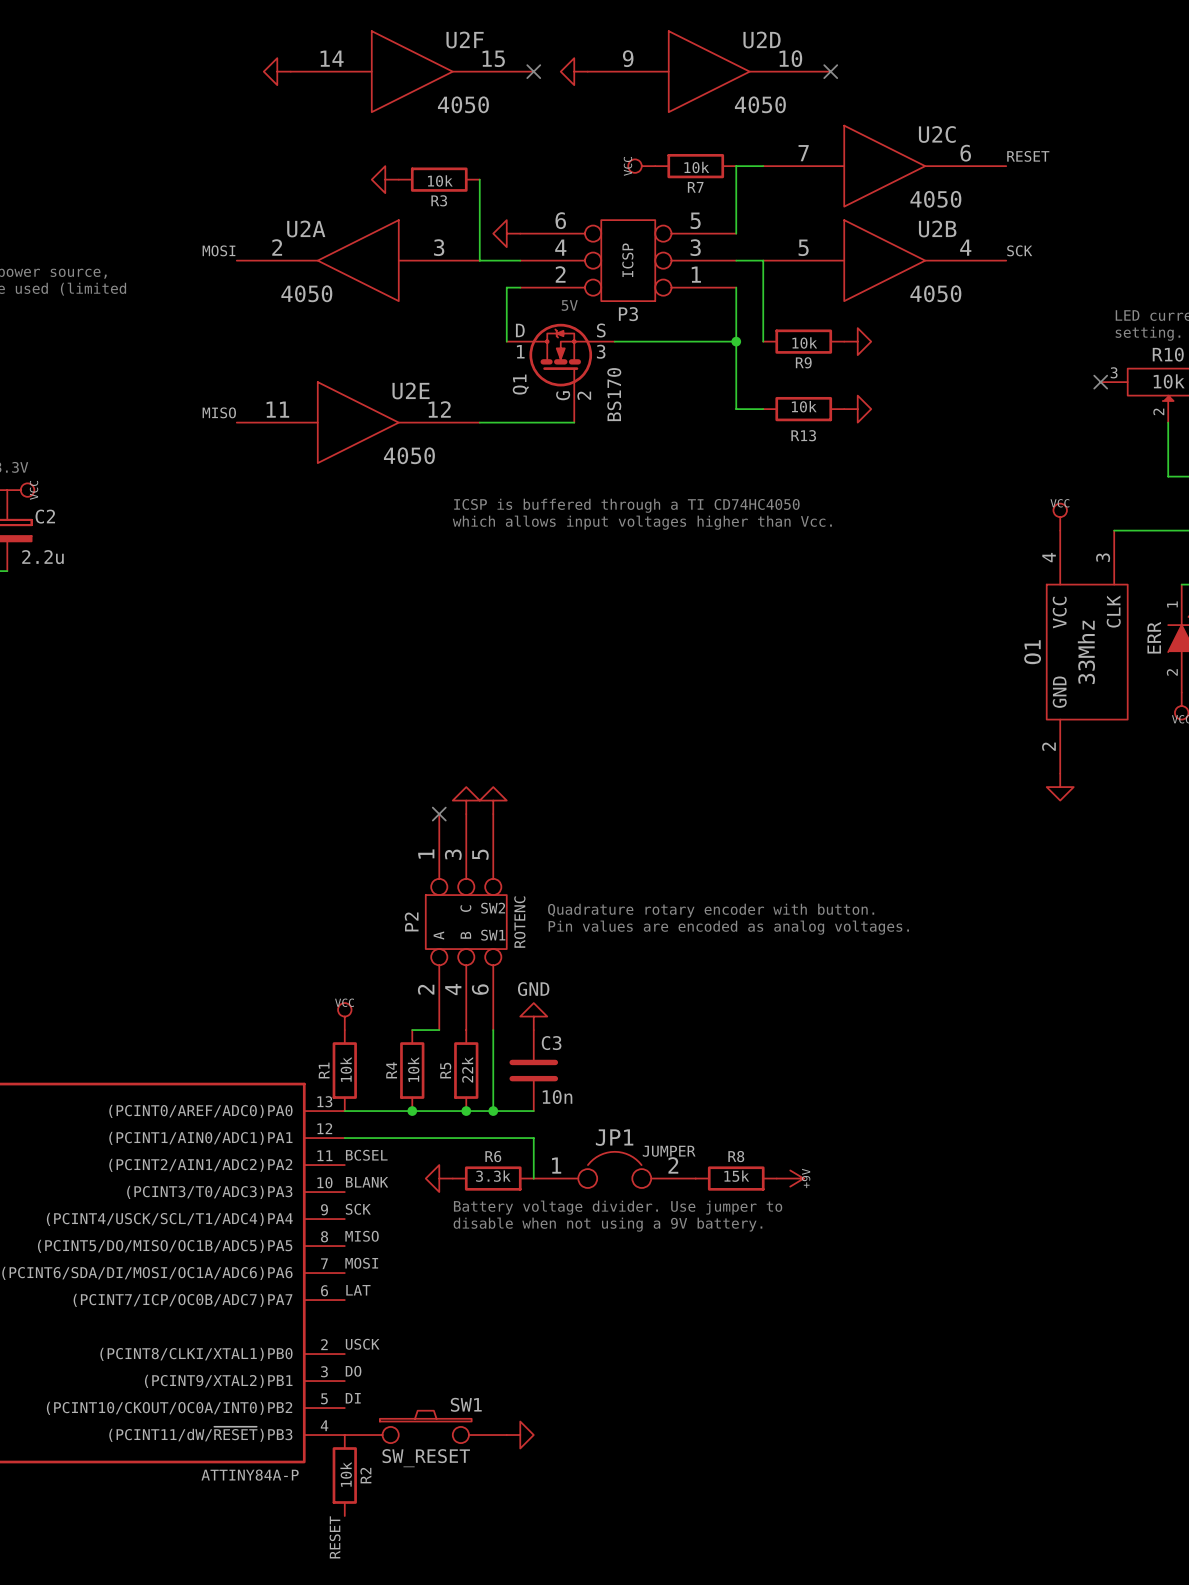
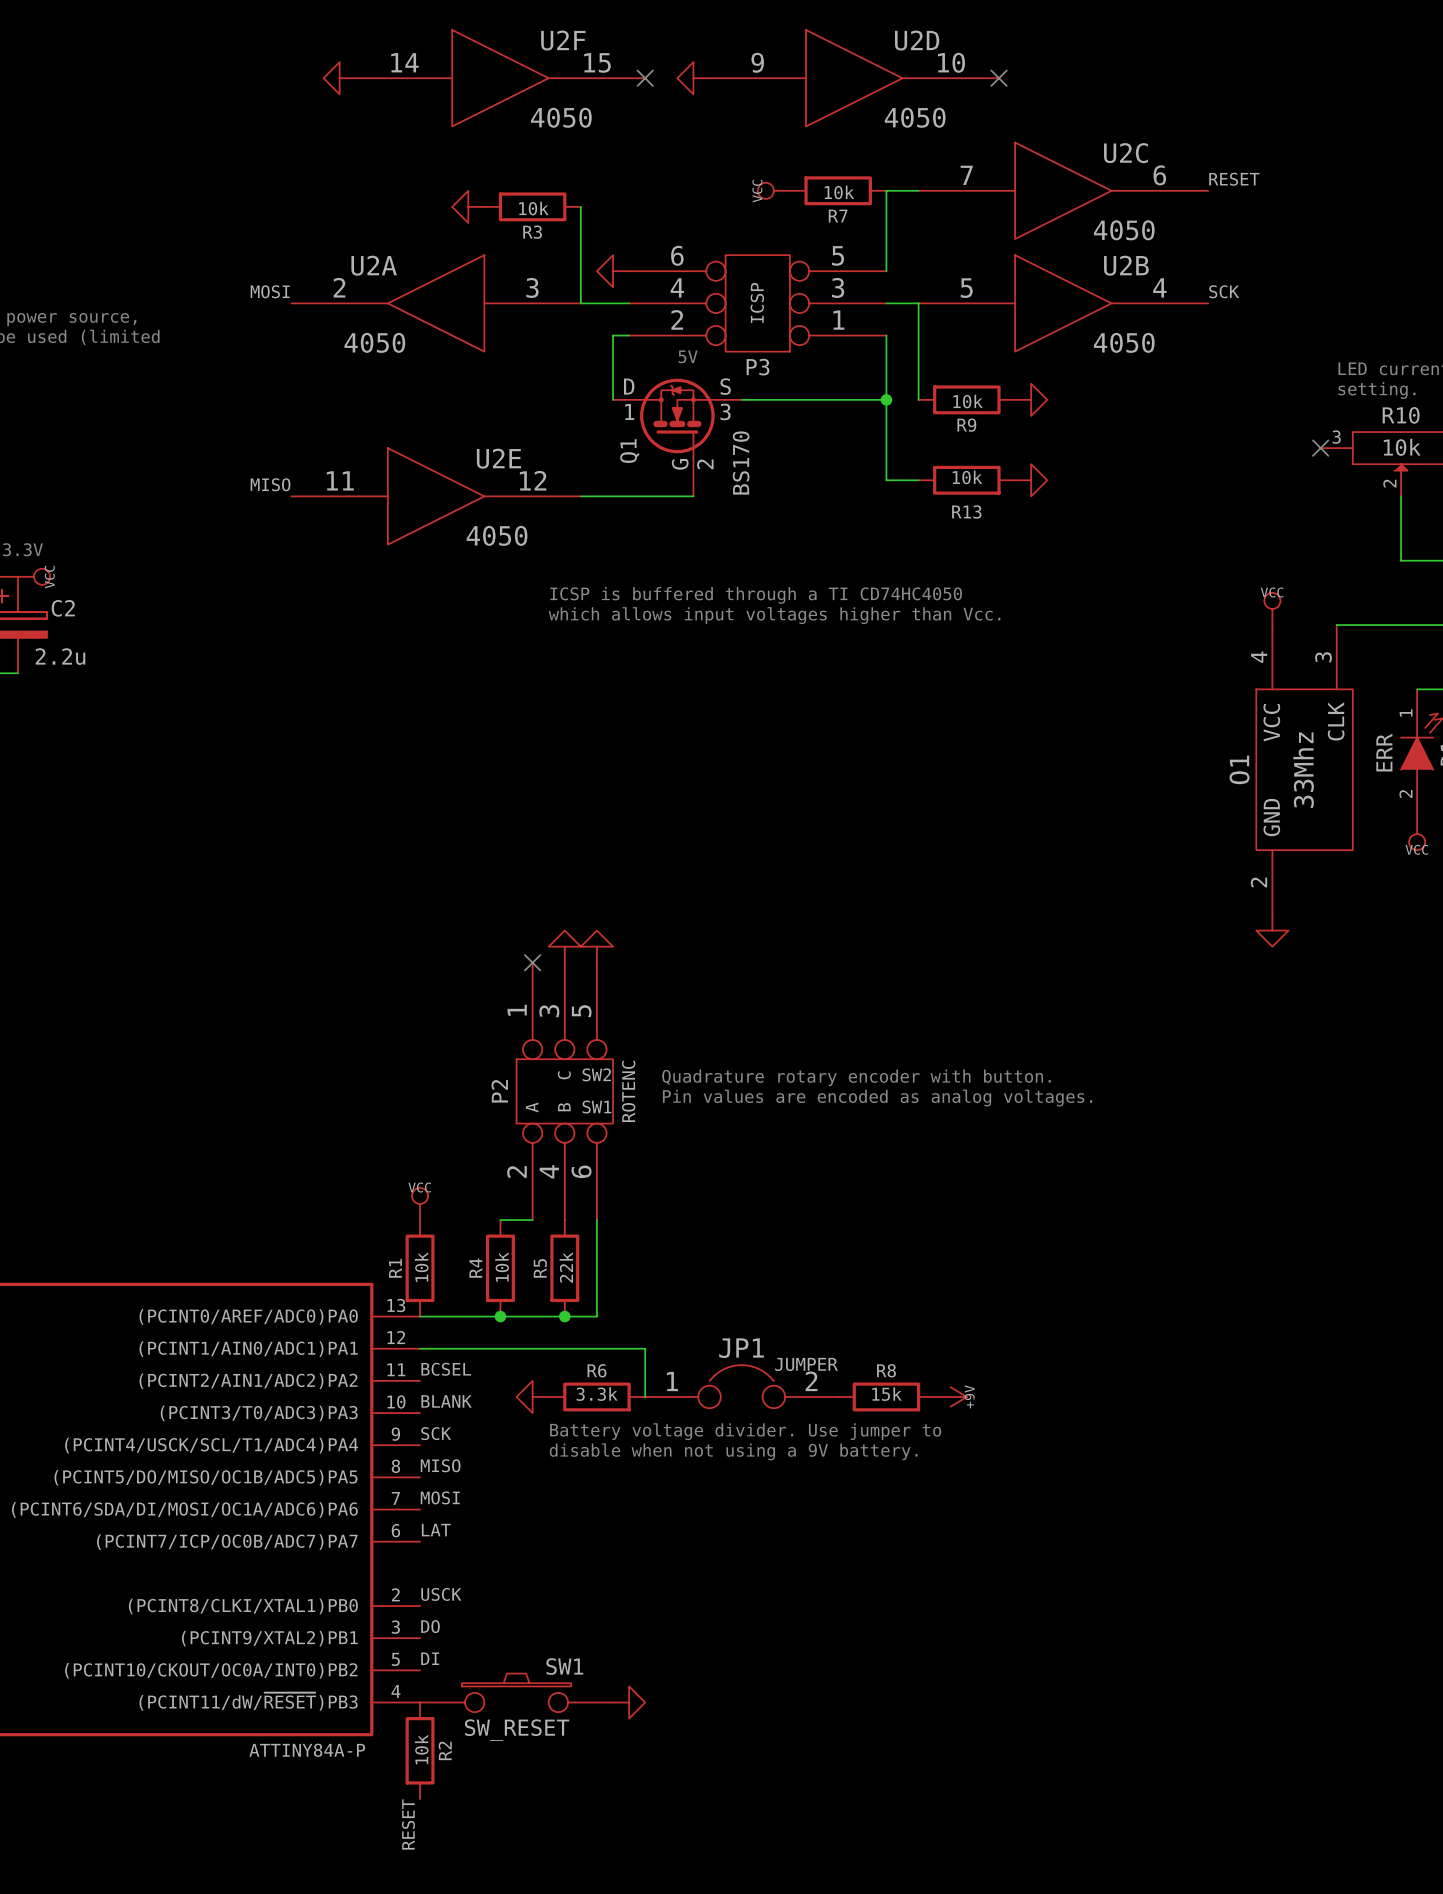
power symbol: GND (533, 1016) -> none
C3: 10n (533, 1070) -> none
wire: (493, 1111) (533, 1111) -> none
junction: (493, 1111) -> none

